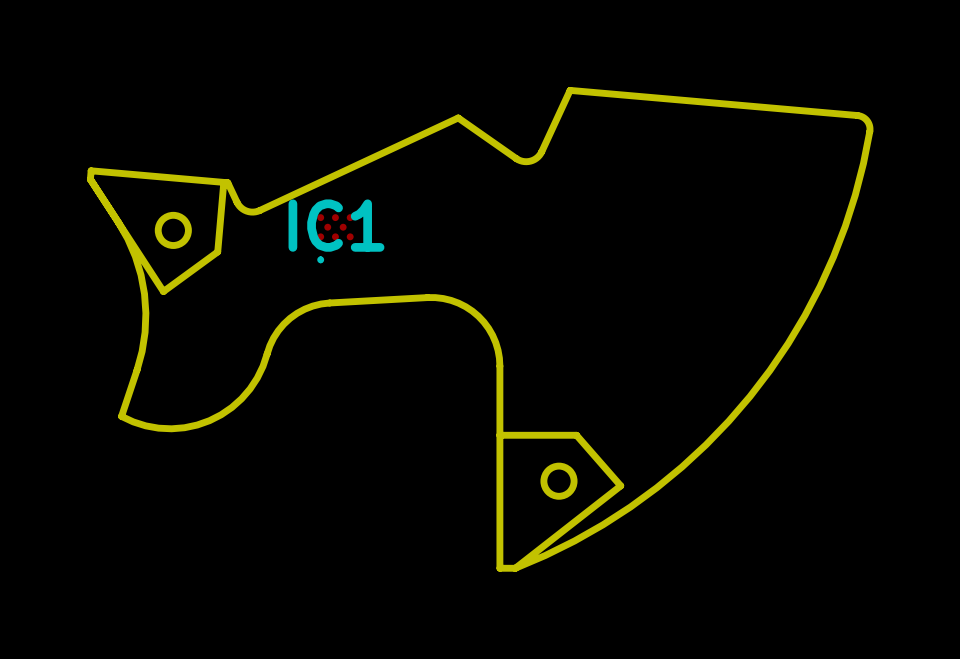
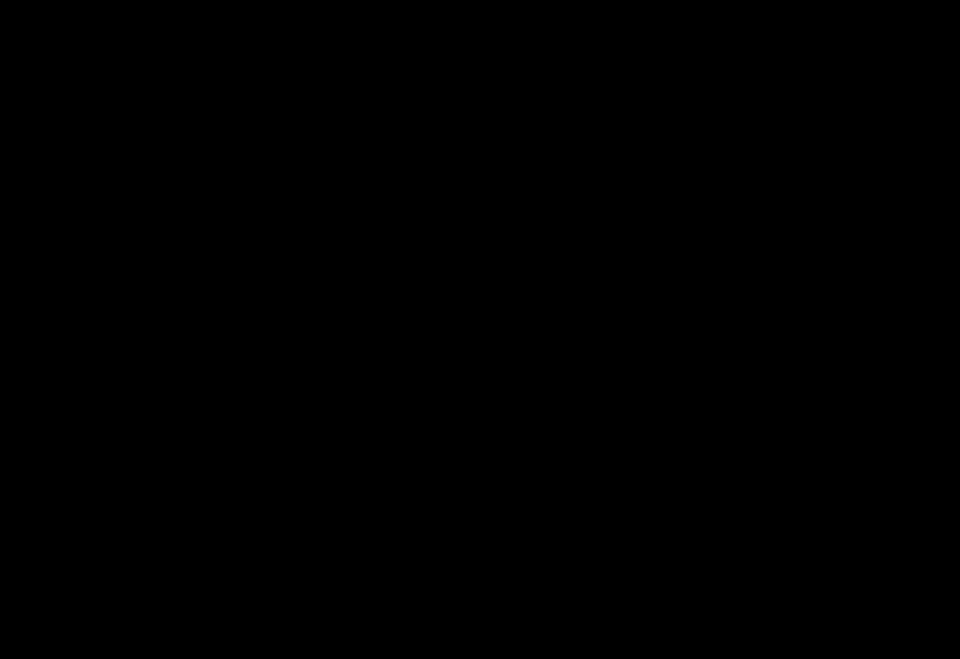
board edge: (90, 179) (91, 170) (227, 182) (239, 206) (246, 211) (255, 211) (458, 117) (516, 158) (528, 161) (536, 158) (540, 153) (570, 90) (857, 115) (866, 119) (870, 129) (863, 163) (855, 195) (833, 256) (804, 315) (769, 370) (750, 396) (706, 444) (656, 487) (603, 524) (574, 540) (515, 568) -> none
board edge: (90, 179) (163, 291) (217, 251) (223, 182) -> none
board edge: (90, 179) (127, 238) (135, 256) (144, 293) (145, 313) (142, 351) (121, 416) (133, 421) (158, 428) (184, 427) (197, 425) (221, 414) (241, 398) (250, 388) (263, 366) (273, 338) (283, 324) (297, 313) (312, 306) (329, 302) (435, 297) (458, 303) (478, 316) (492, 335) (499, 358) (499, 568) (515, 568) -> none
round board edge: [154, 211, 192, 249] -> none
IC1: (335, 238) -> none
board edge: (499, 435) (576, 435) (620, 485) (515, 568) -> none
round board edge: [540, 462, 578, 500] -> none

